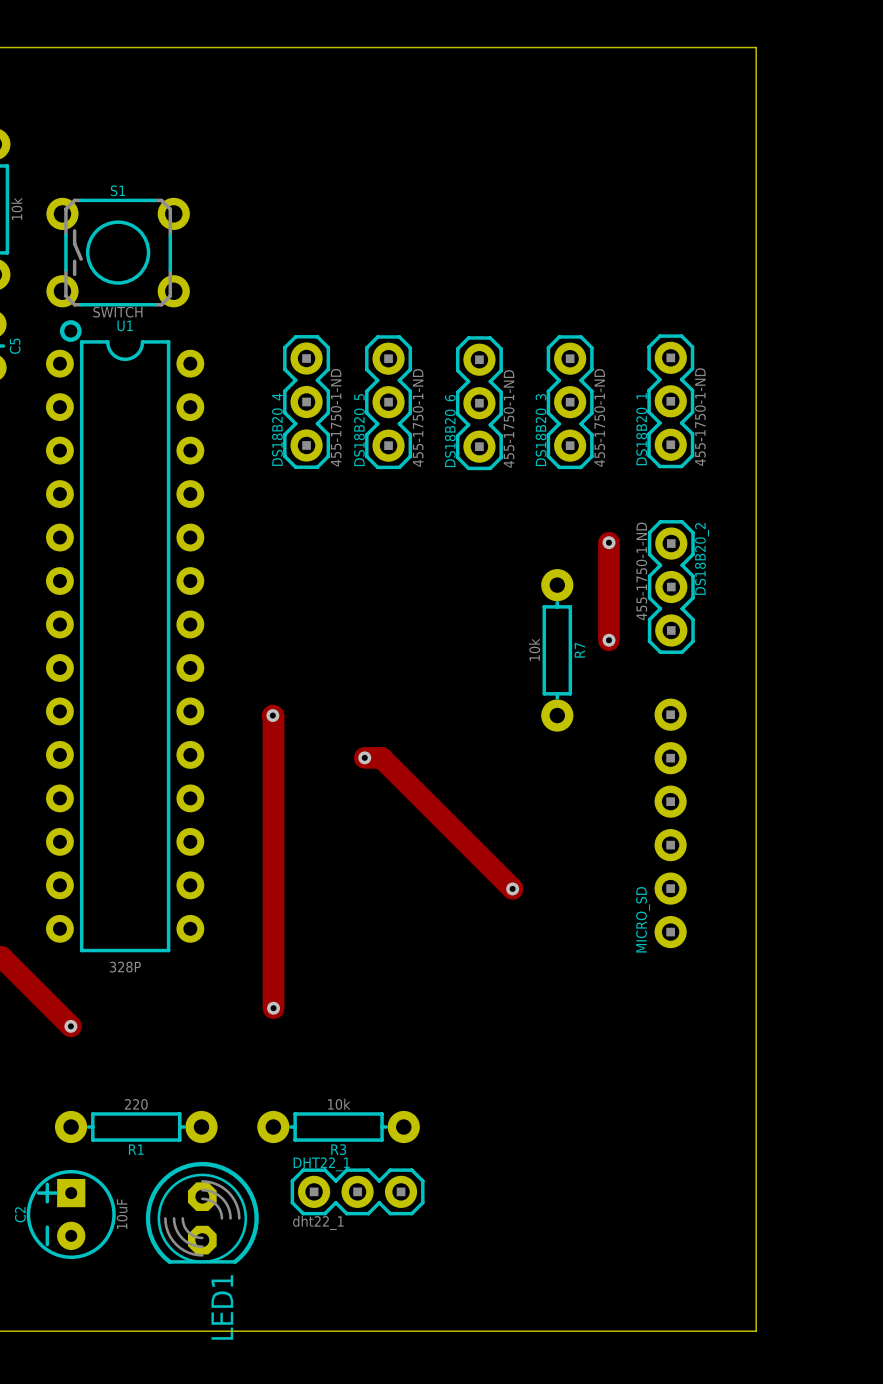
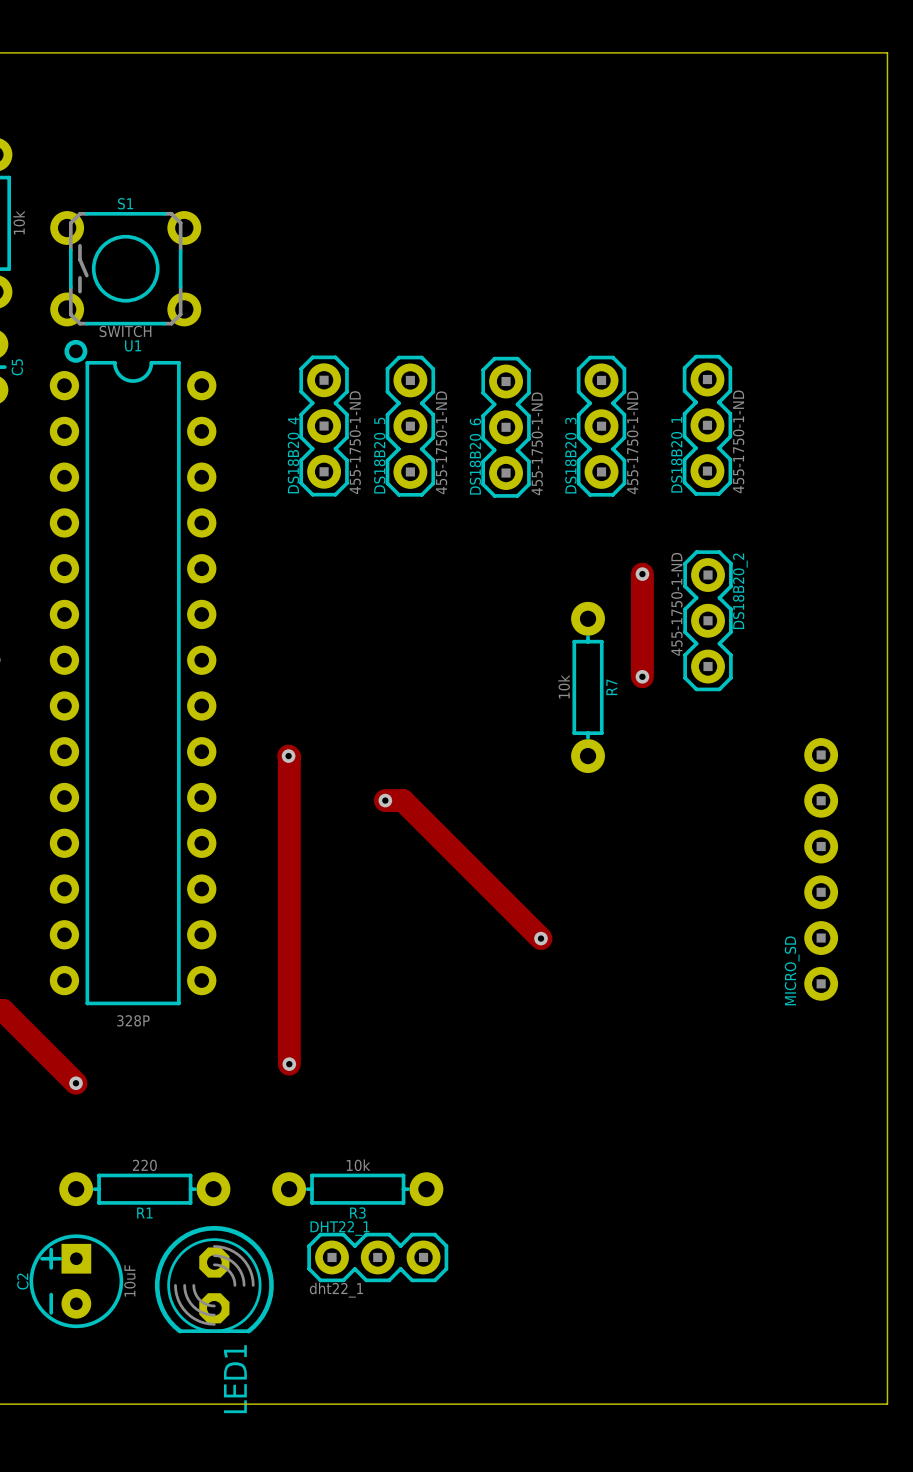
board edge: (756, 47) (756, 1331) -> (797, 52) (887, 52) (887, 1404) (797, 1404)
MICRO_SD position: (670, 823) -> (821, 869)

